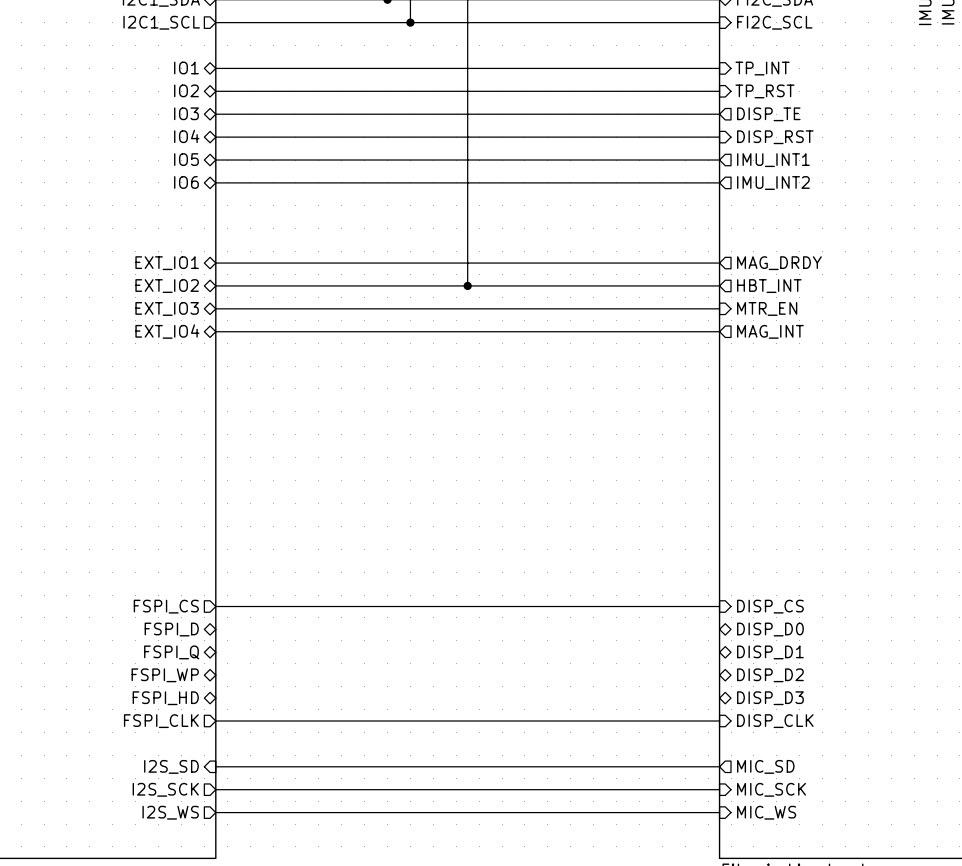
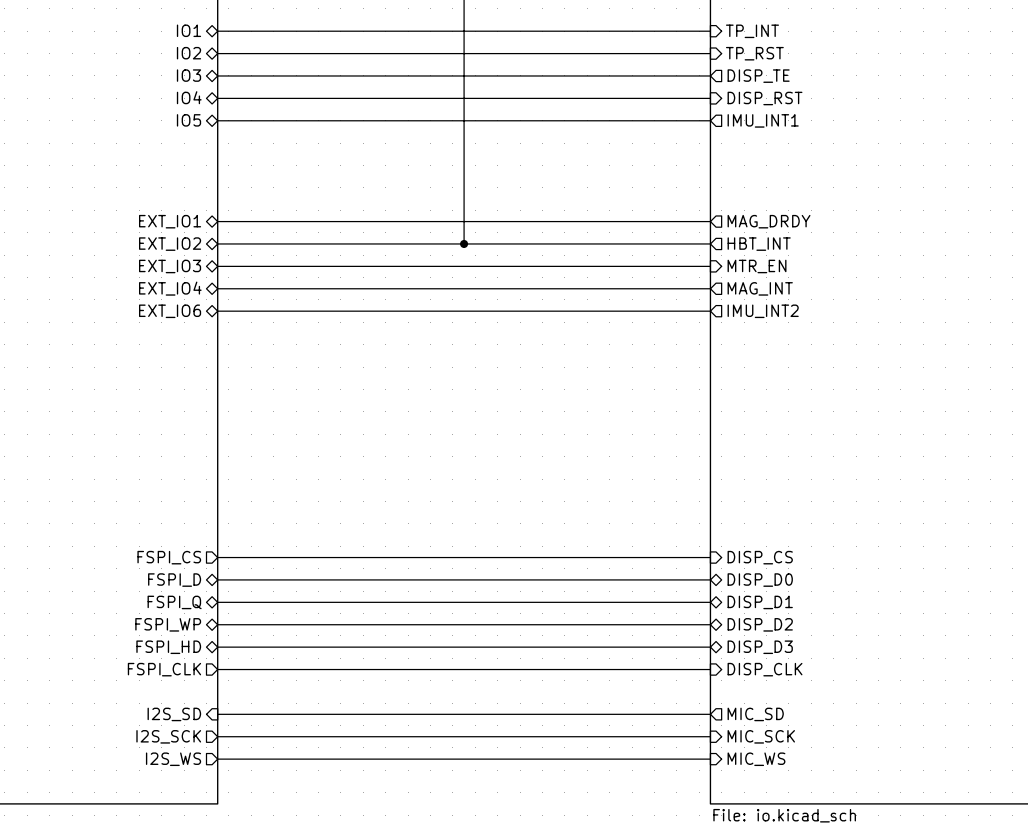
sheet pin: IO6 (186, 182) -> none
wire: (215, 182) (719, 182) -> (217, 311) (710, 311)
sheet pin position: IMU_INT2 (773, 183) -> IMU_INT2 (763, 311)
sheet pin: none -> EXT_IO6 (170, 311)
wire: none -> (217, 579) (710, 579)
wire: none -> (217, 602) (710, 602)
wire: none -> (217, 624) (710, 624)
wire: none -> (217, 647) (710, 647)

